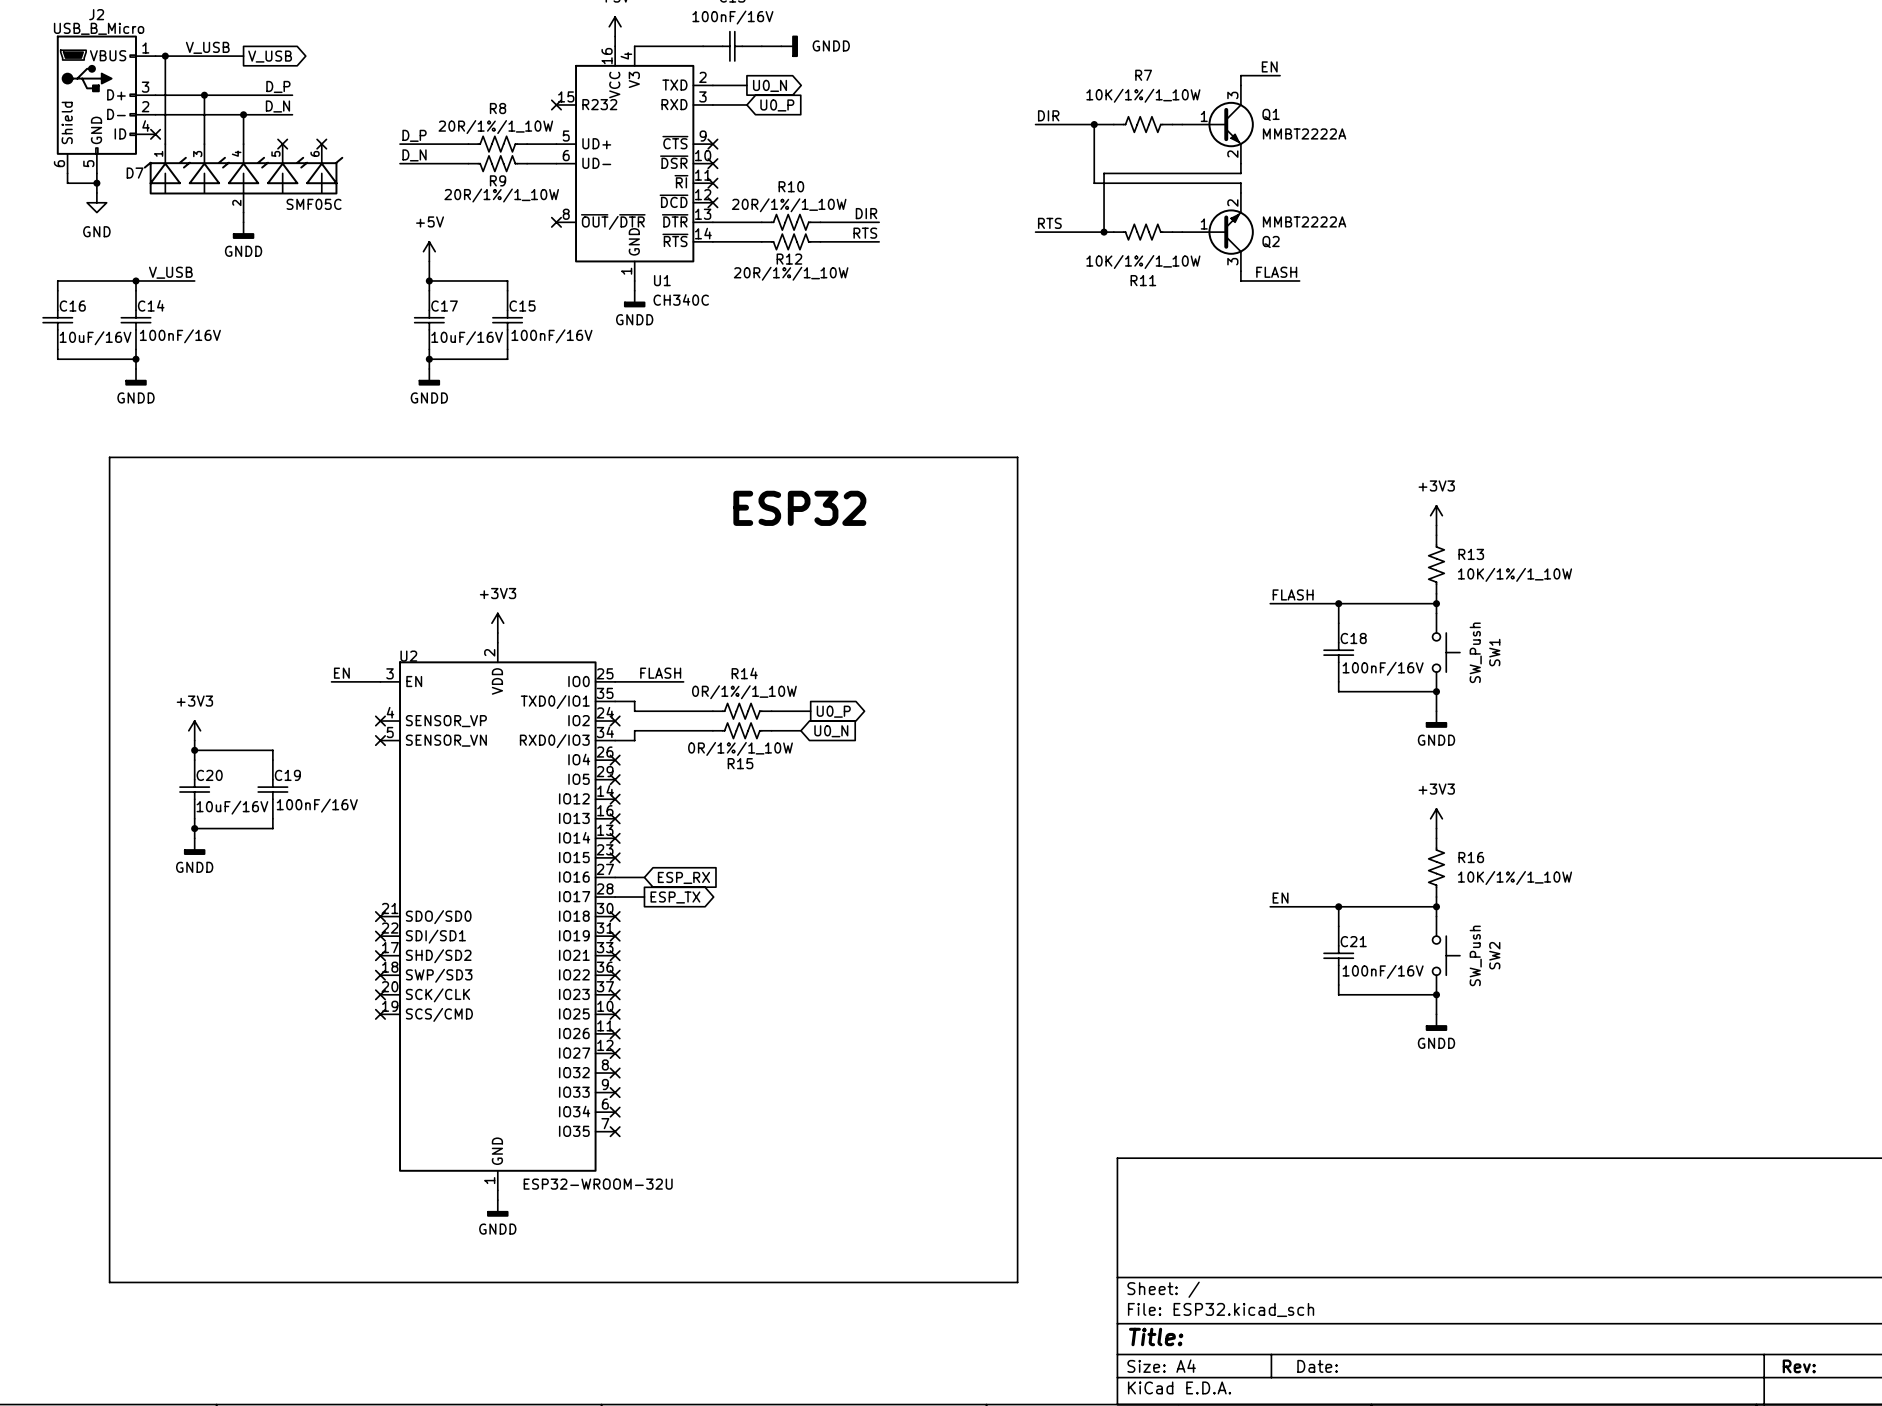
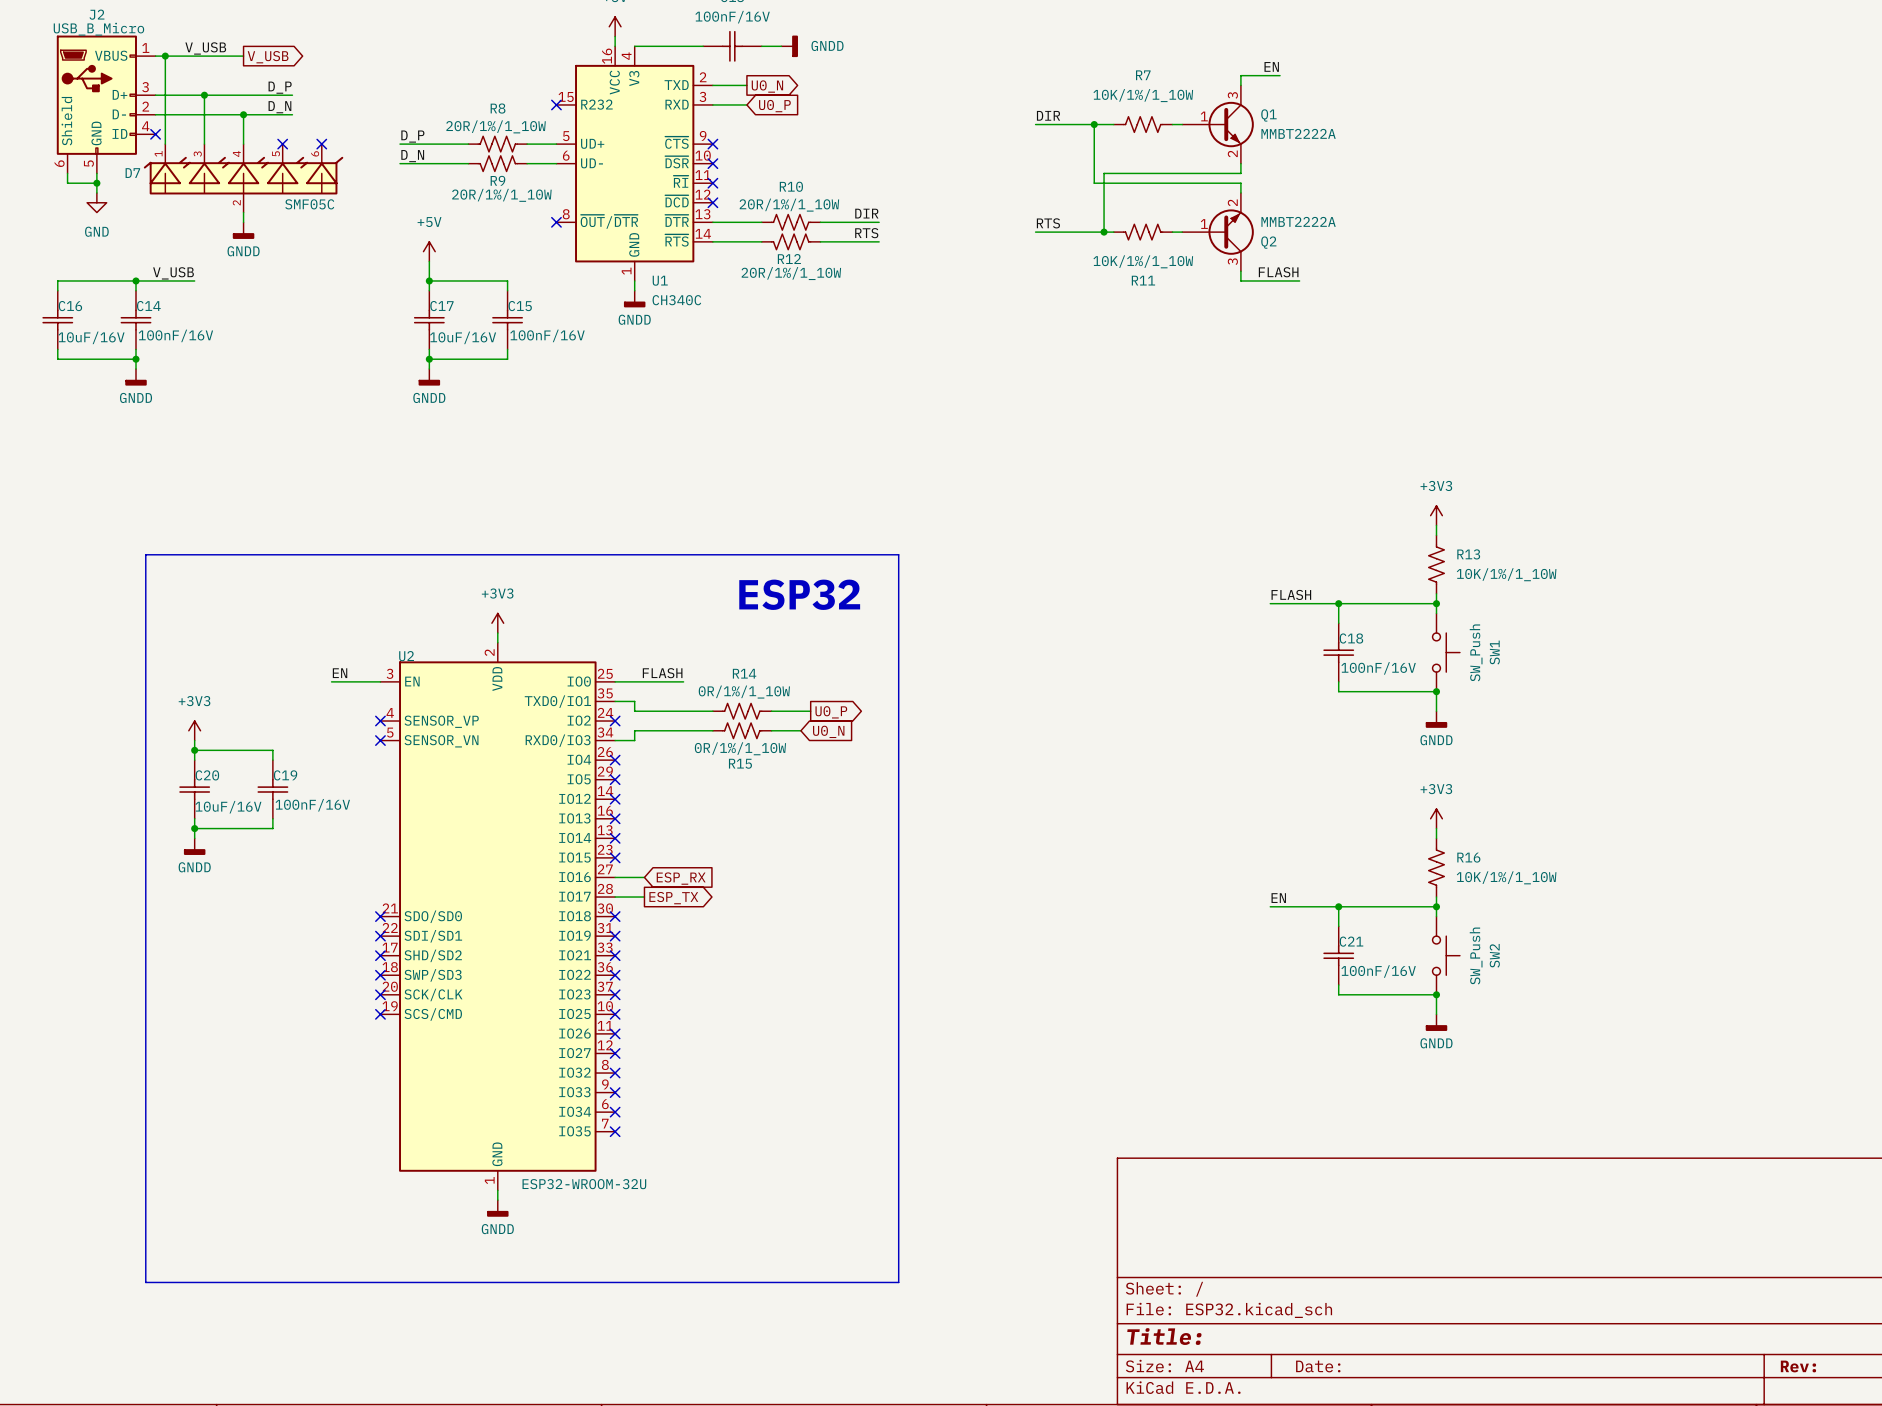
text position: ESP32 (799, 508) -> ESP32 (799, 594)
line: (145, 1282) (109, 1282) (109, 457) (1017, 457) (1017, 1282) (898, 1282) -> (145, 1282) (145, 554) (898, 554) (898, 1282)

